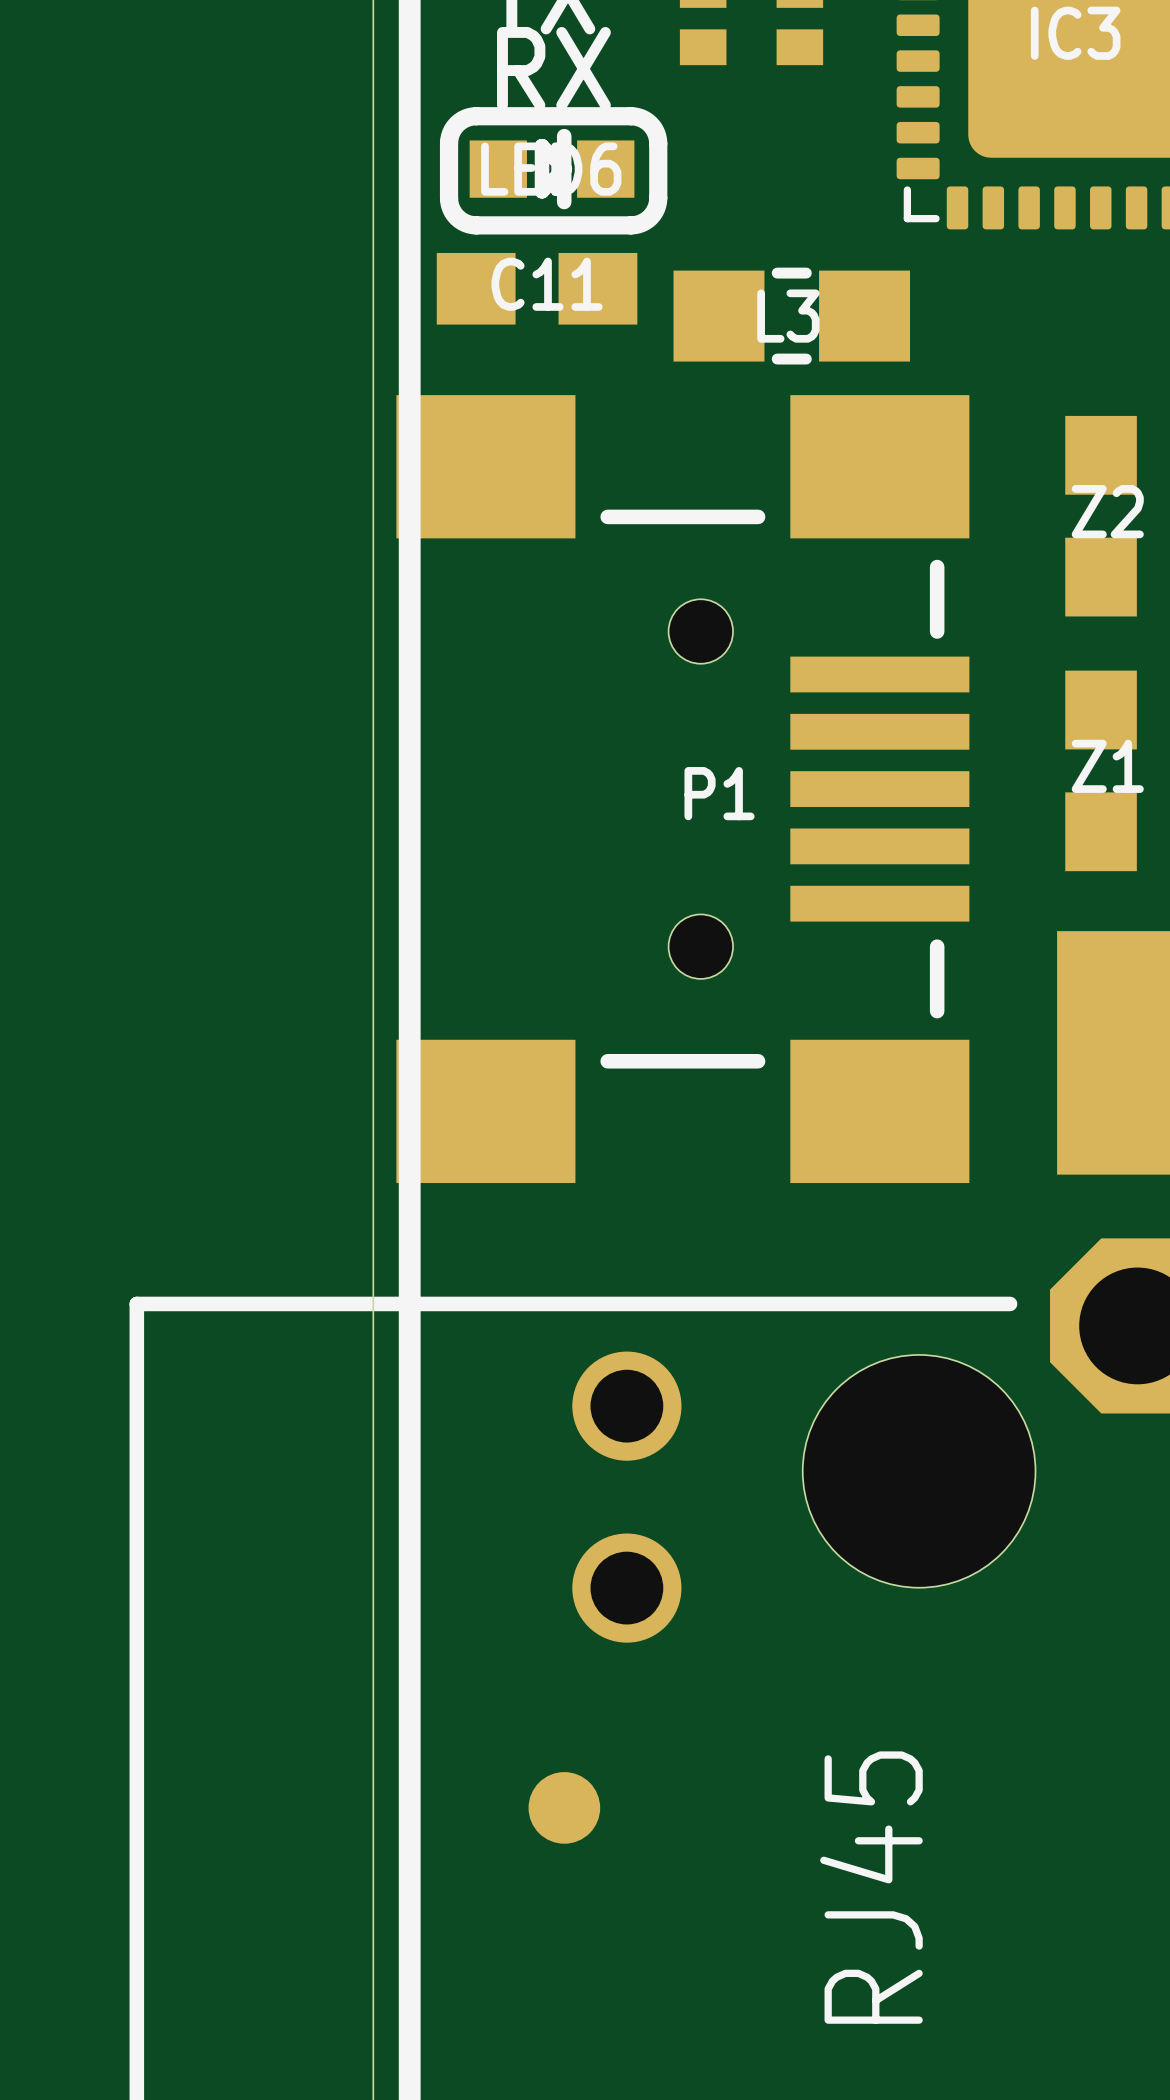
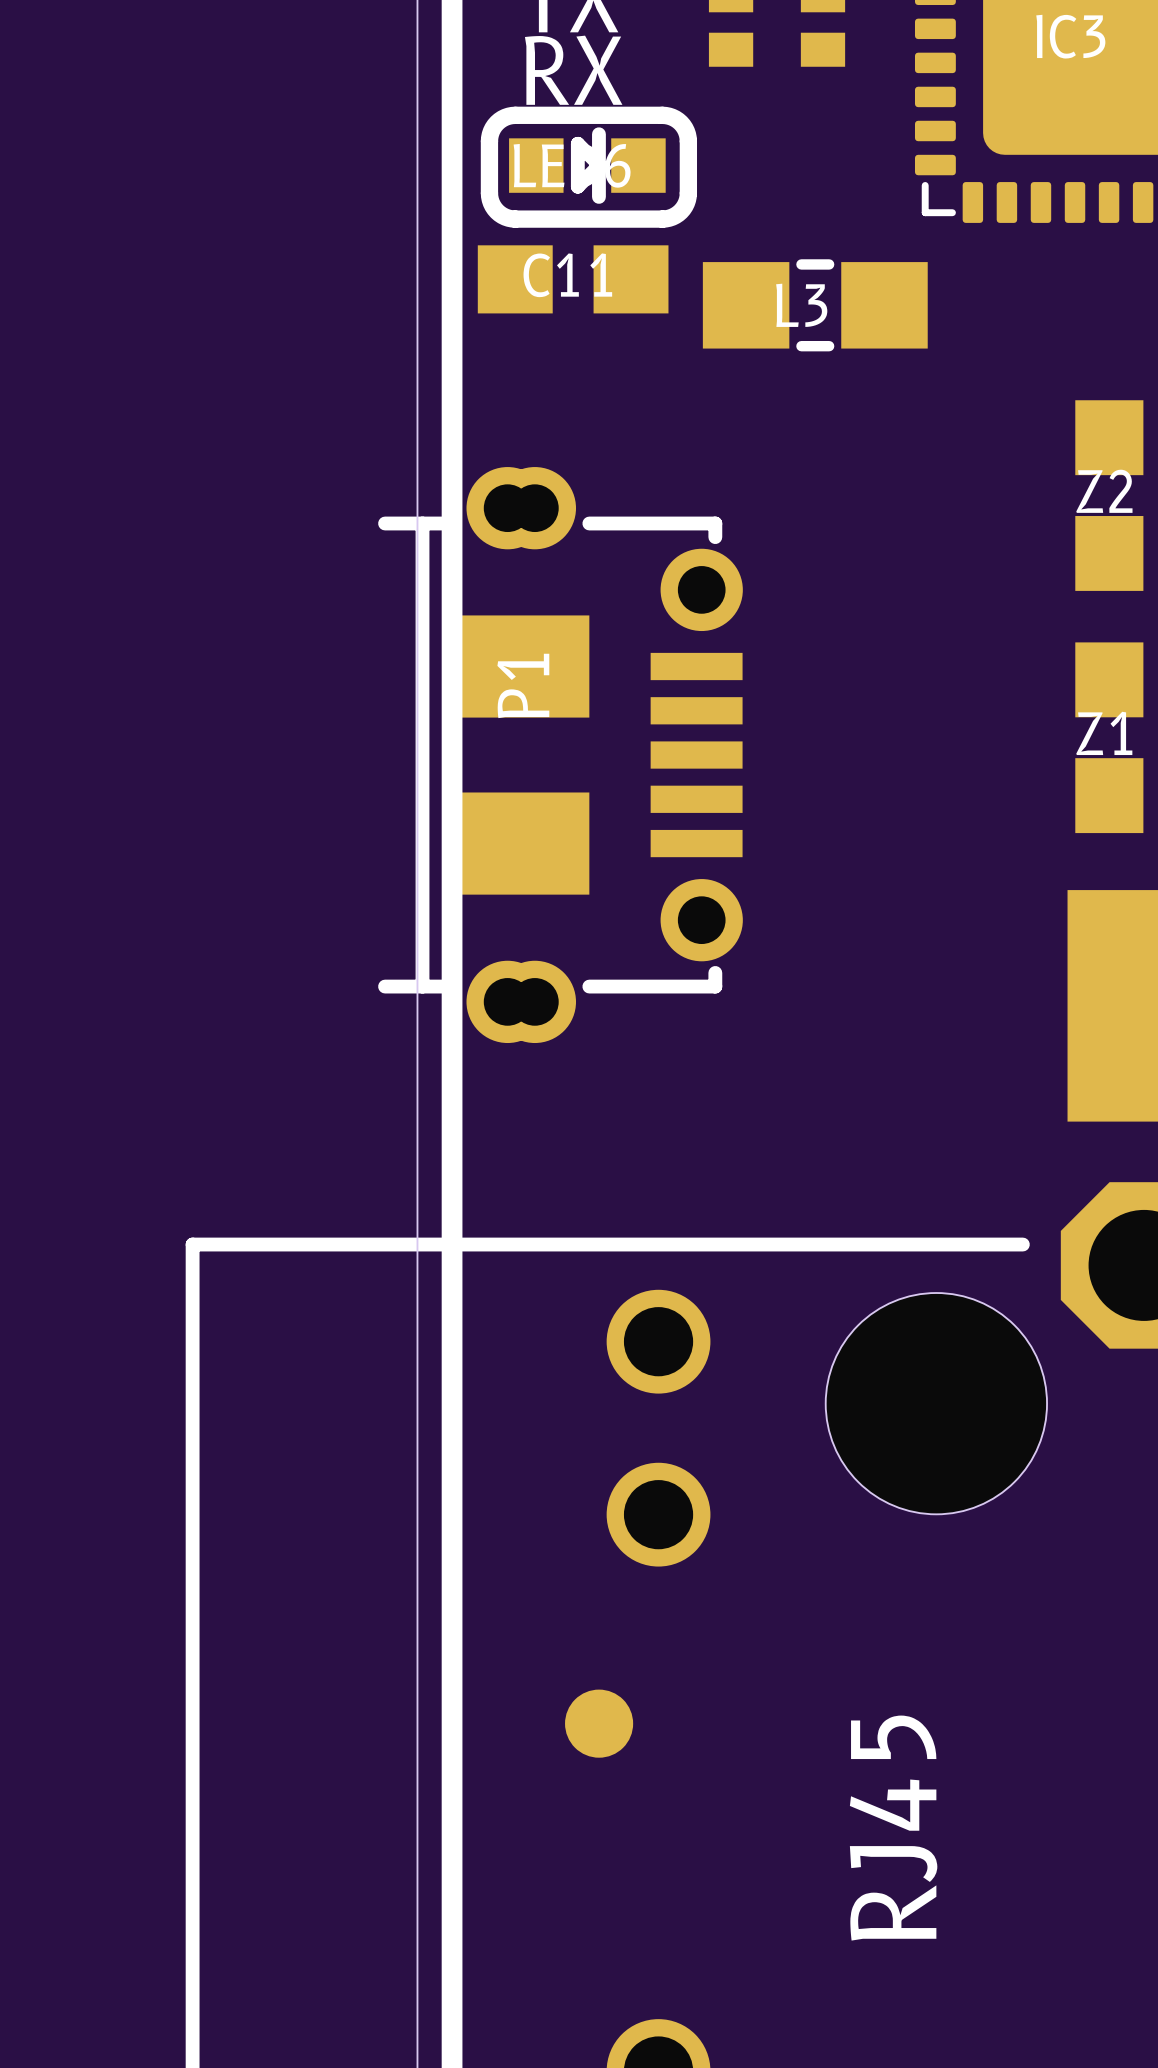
P1 footprint: [396, 395, 970, 1184] -> [378, 467, 743, 1044]

